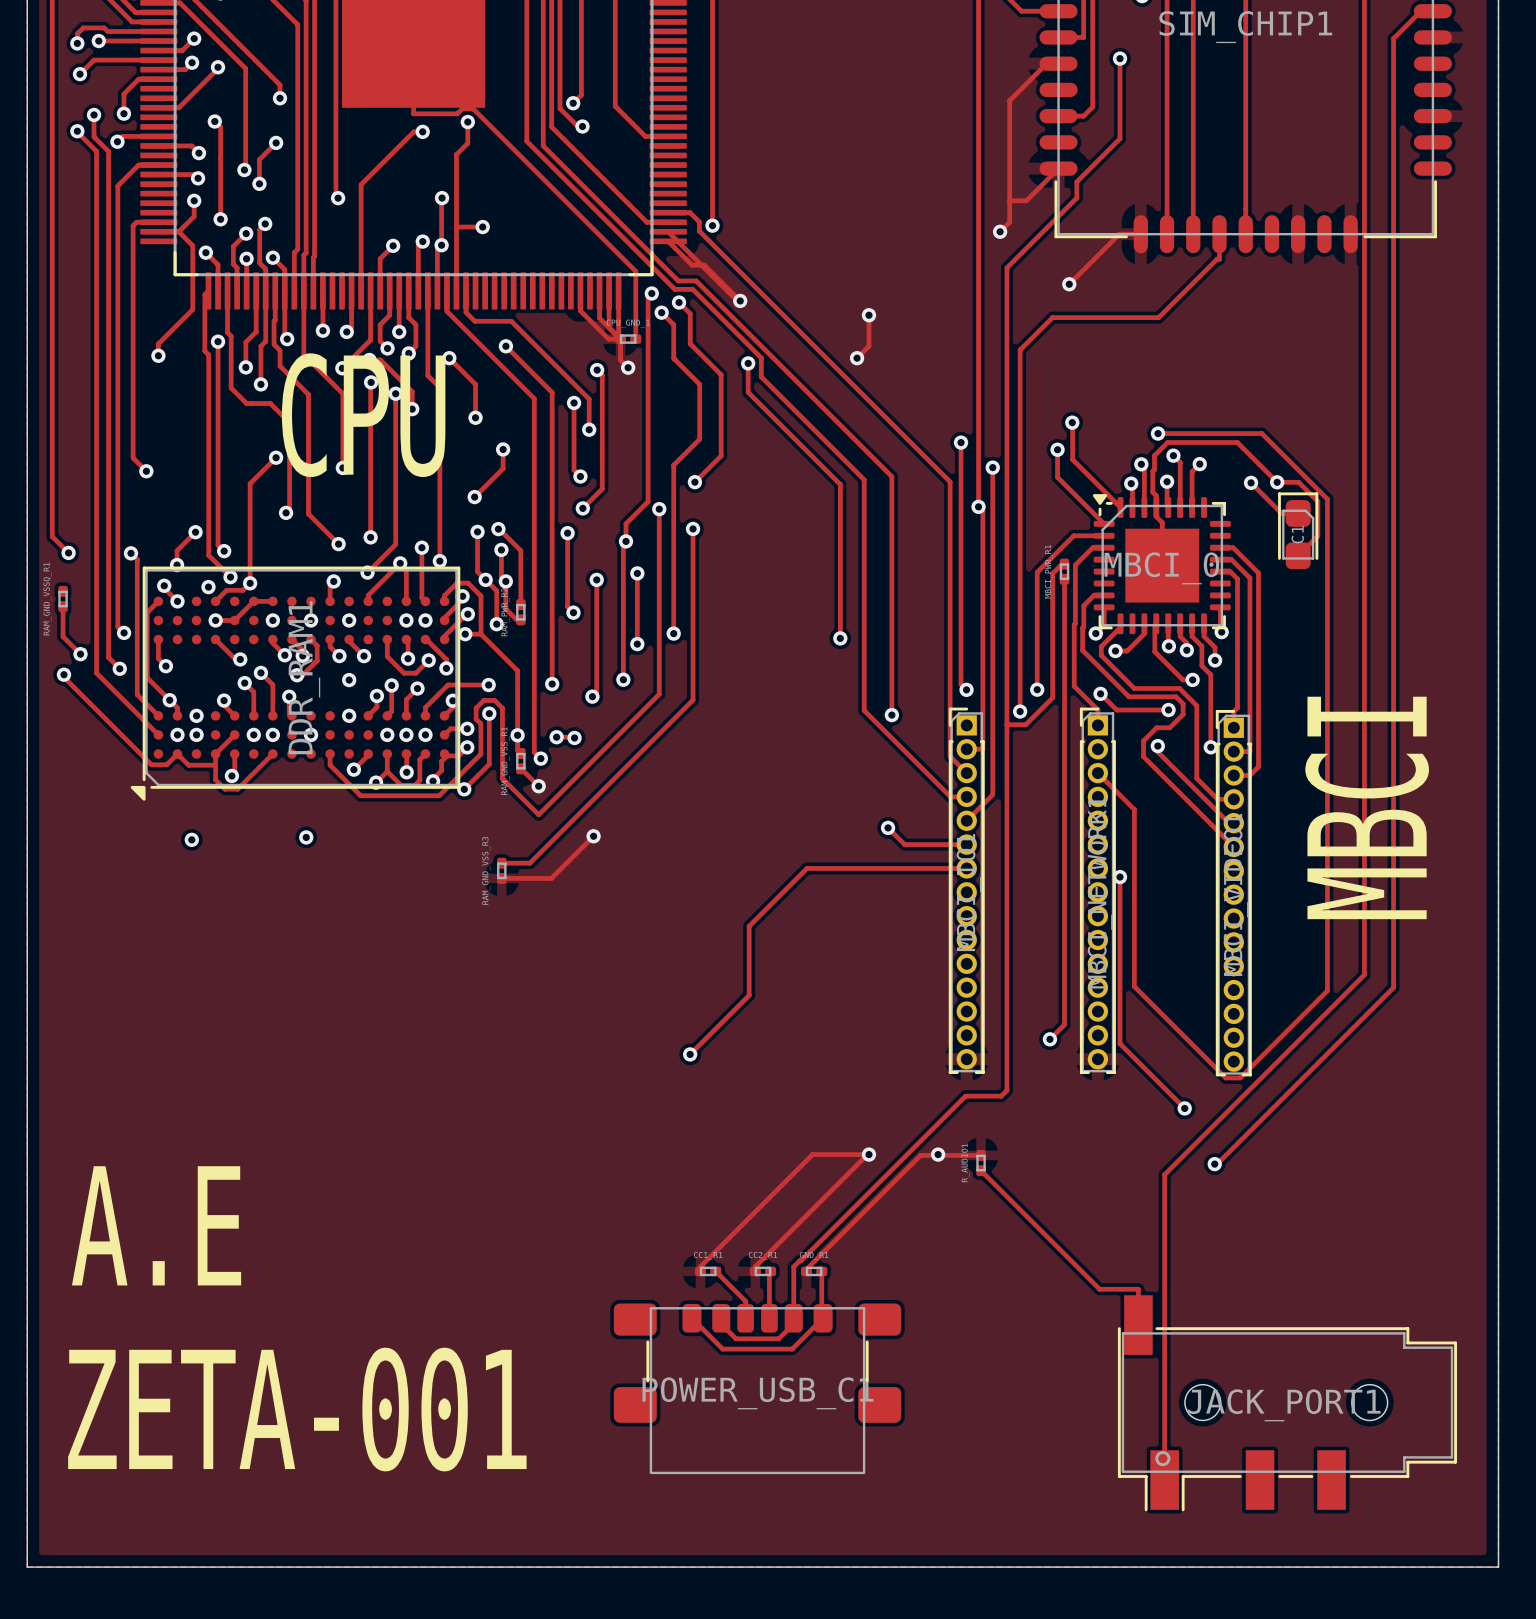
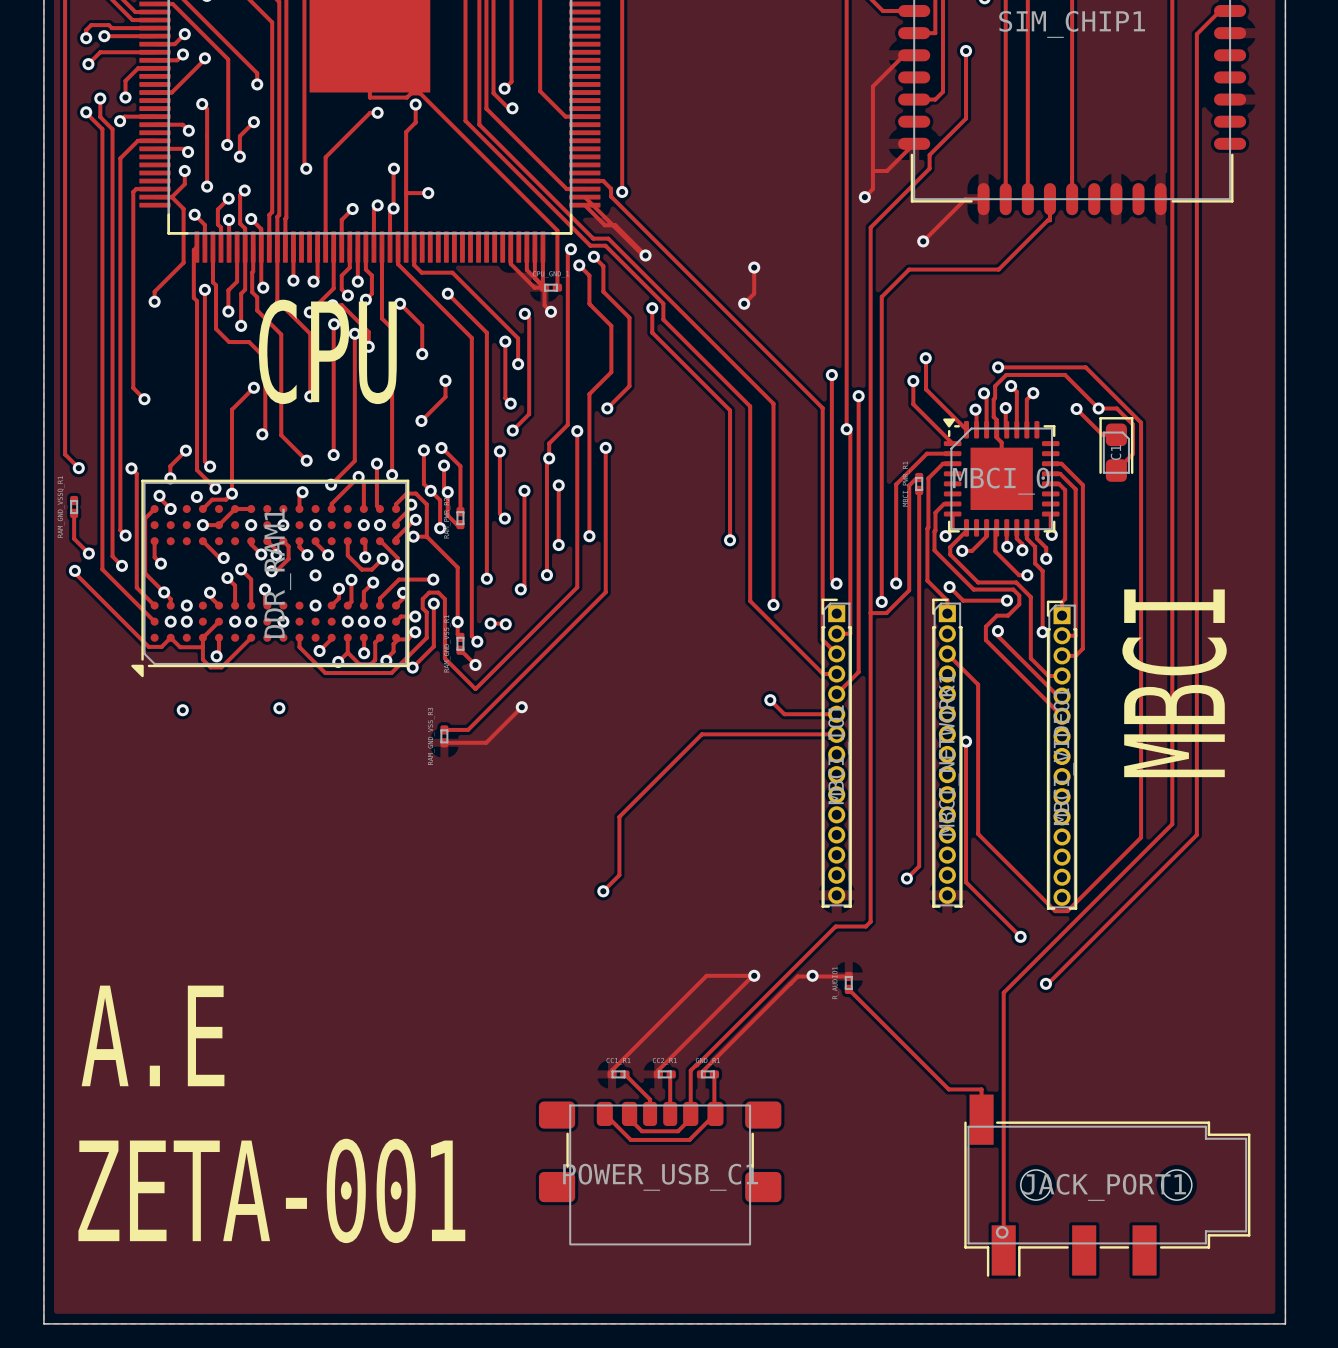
track: (749, 926) (749, 995) (709, 1035) -> (653, 783) (619, 816) (619, 875)

